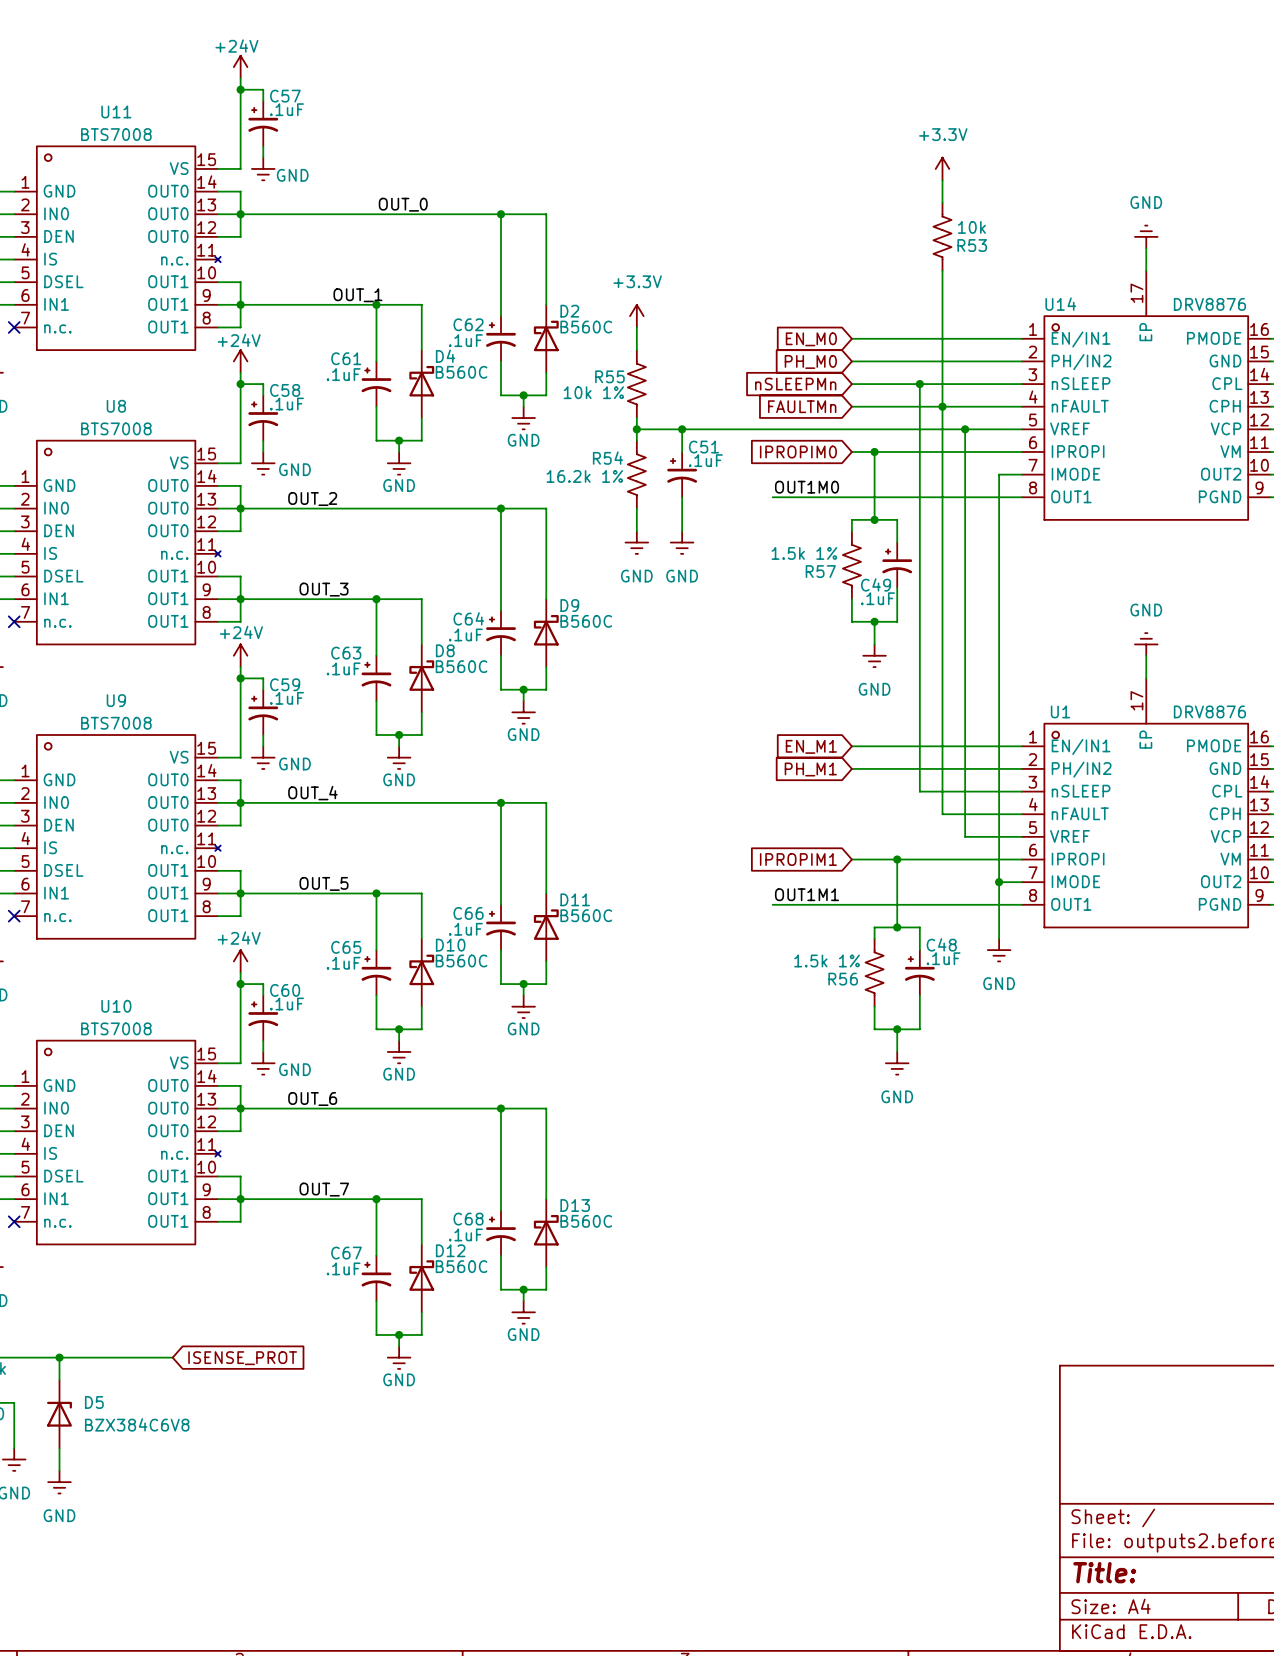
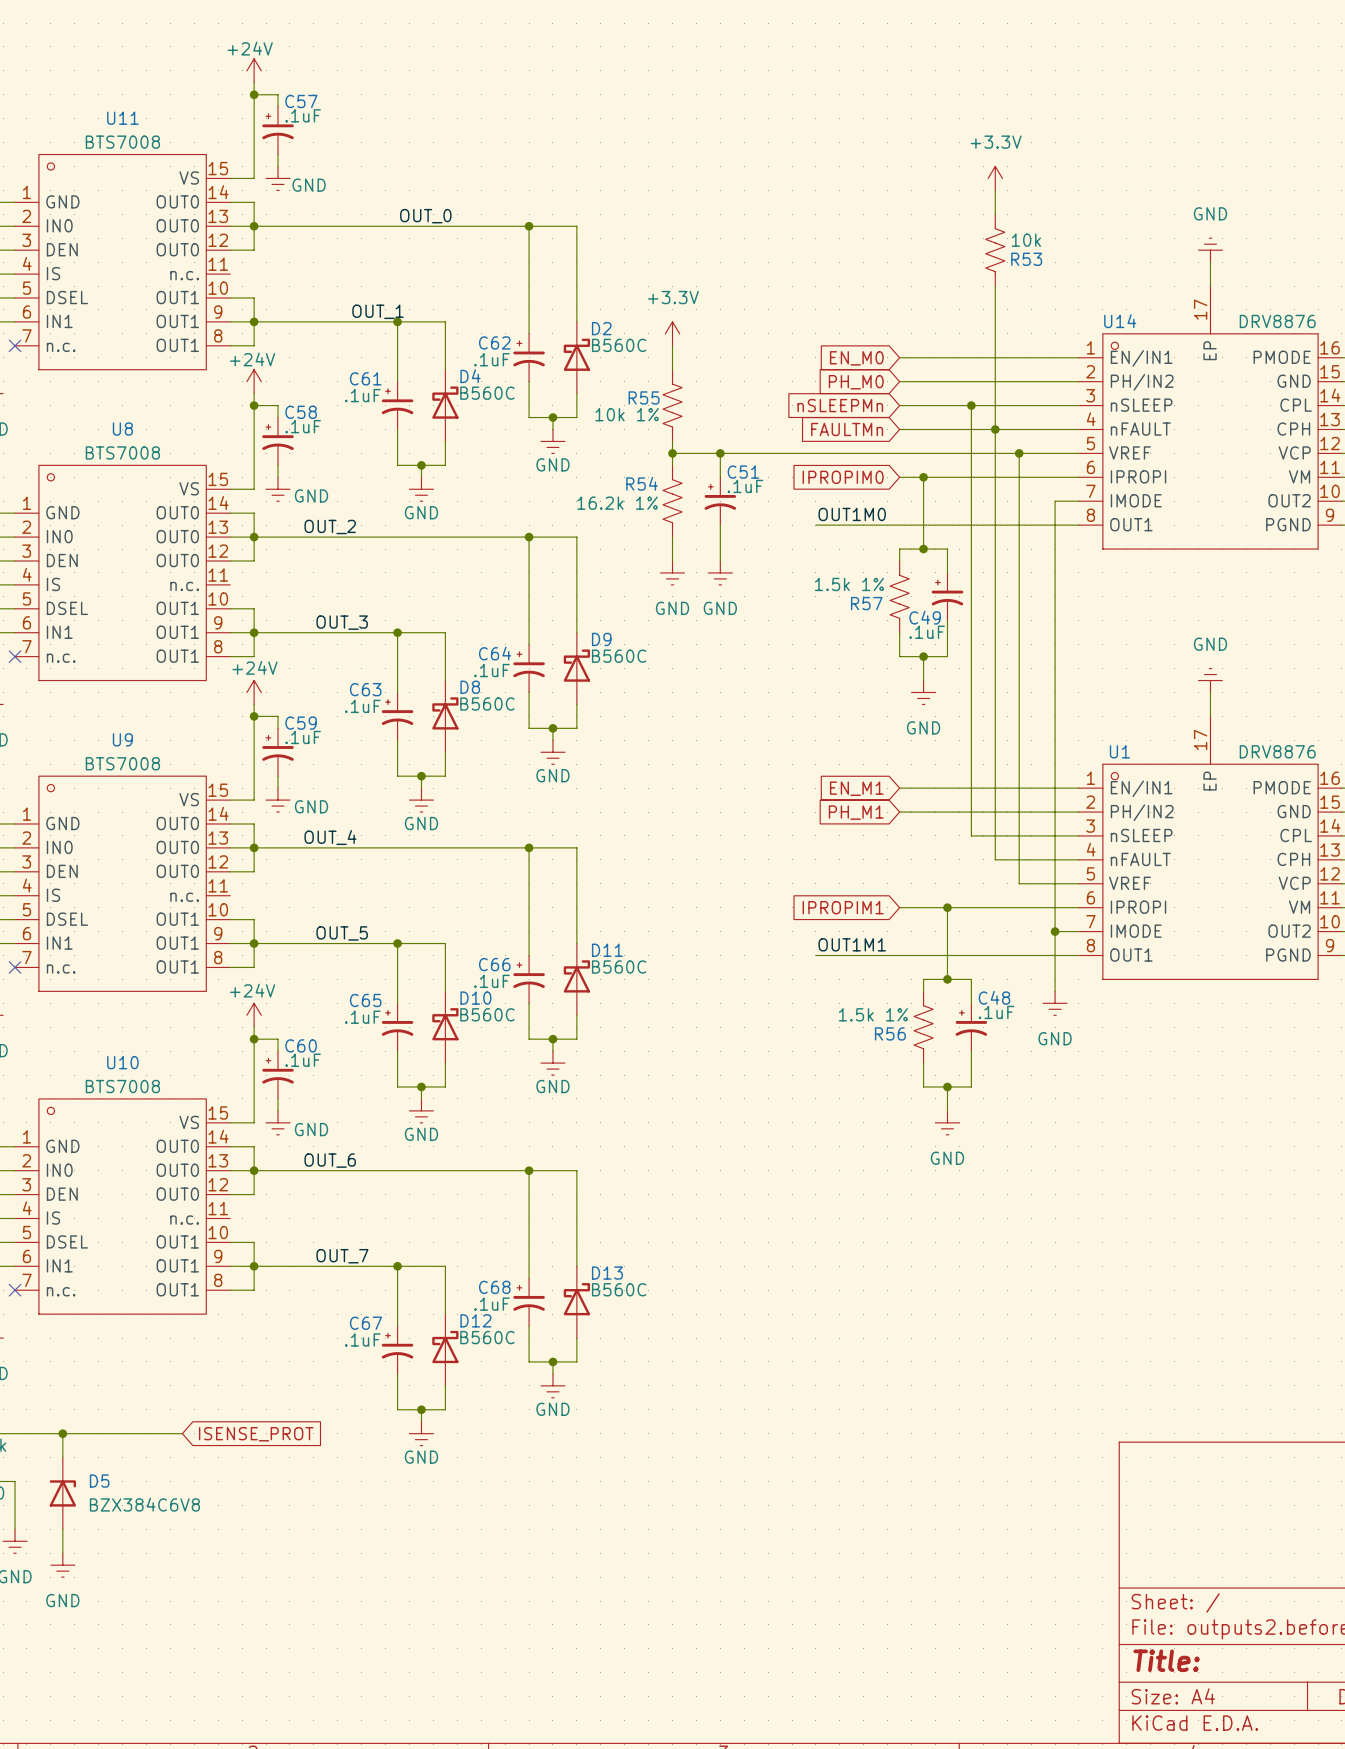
U11 symbol: [14, 146, 221, 351] -> [15, 154, 231, 370]
U8 symbol: [14, 440, 221, 645] -> [15, 465, 231, 681]
U9 symbol: [14, 735, 221, 939] -> [15, 776, 231, 992]
U10 symbol: [14, 1040, 221, 1245] -> [15, 1098, 231, 1315]

